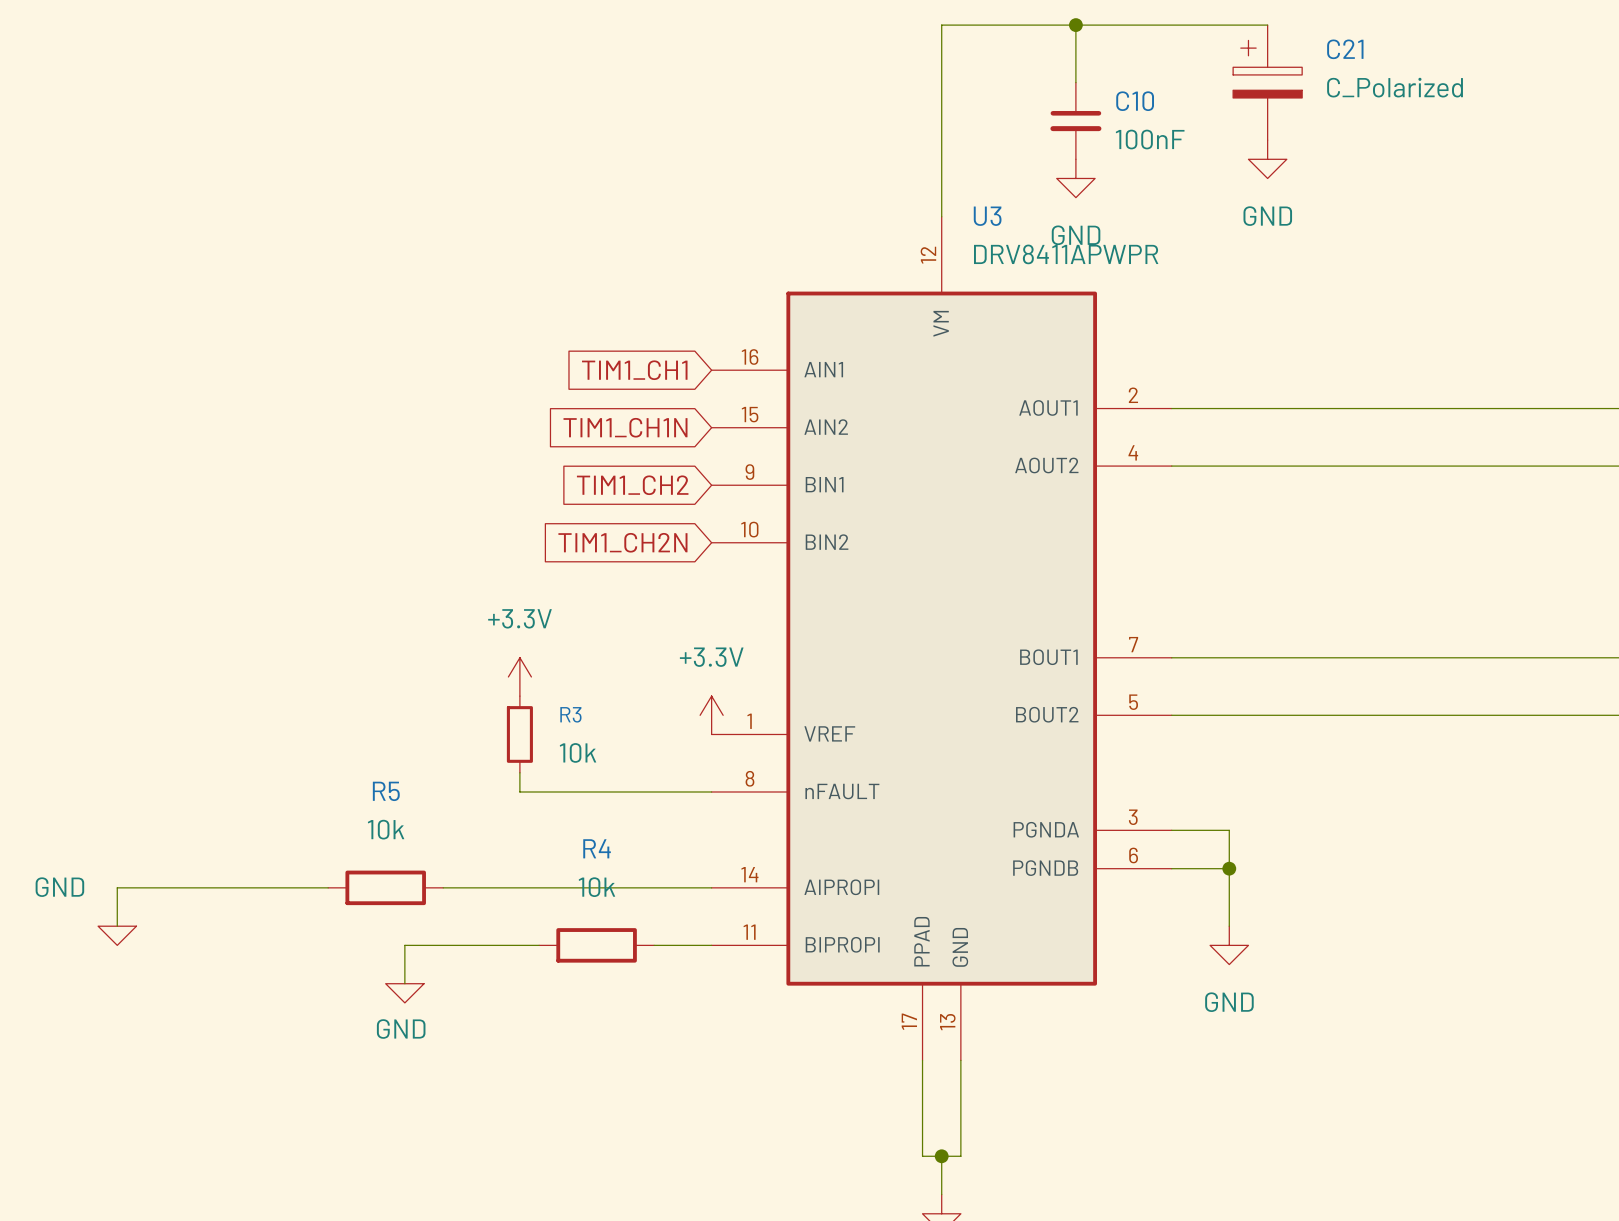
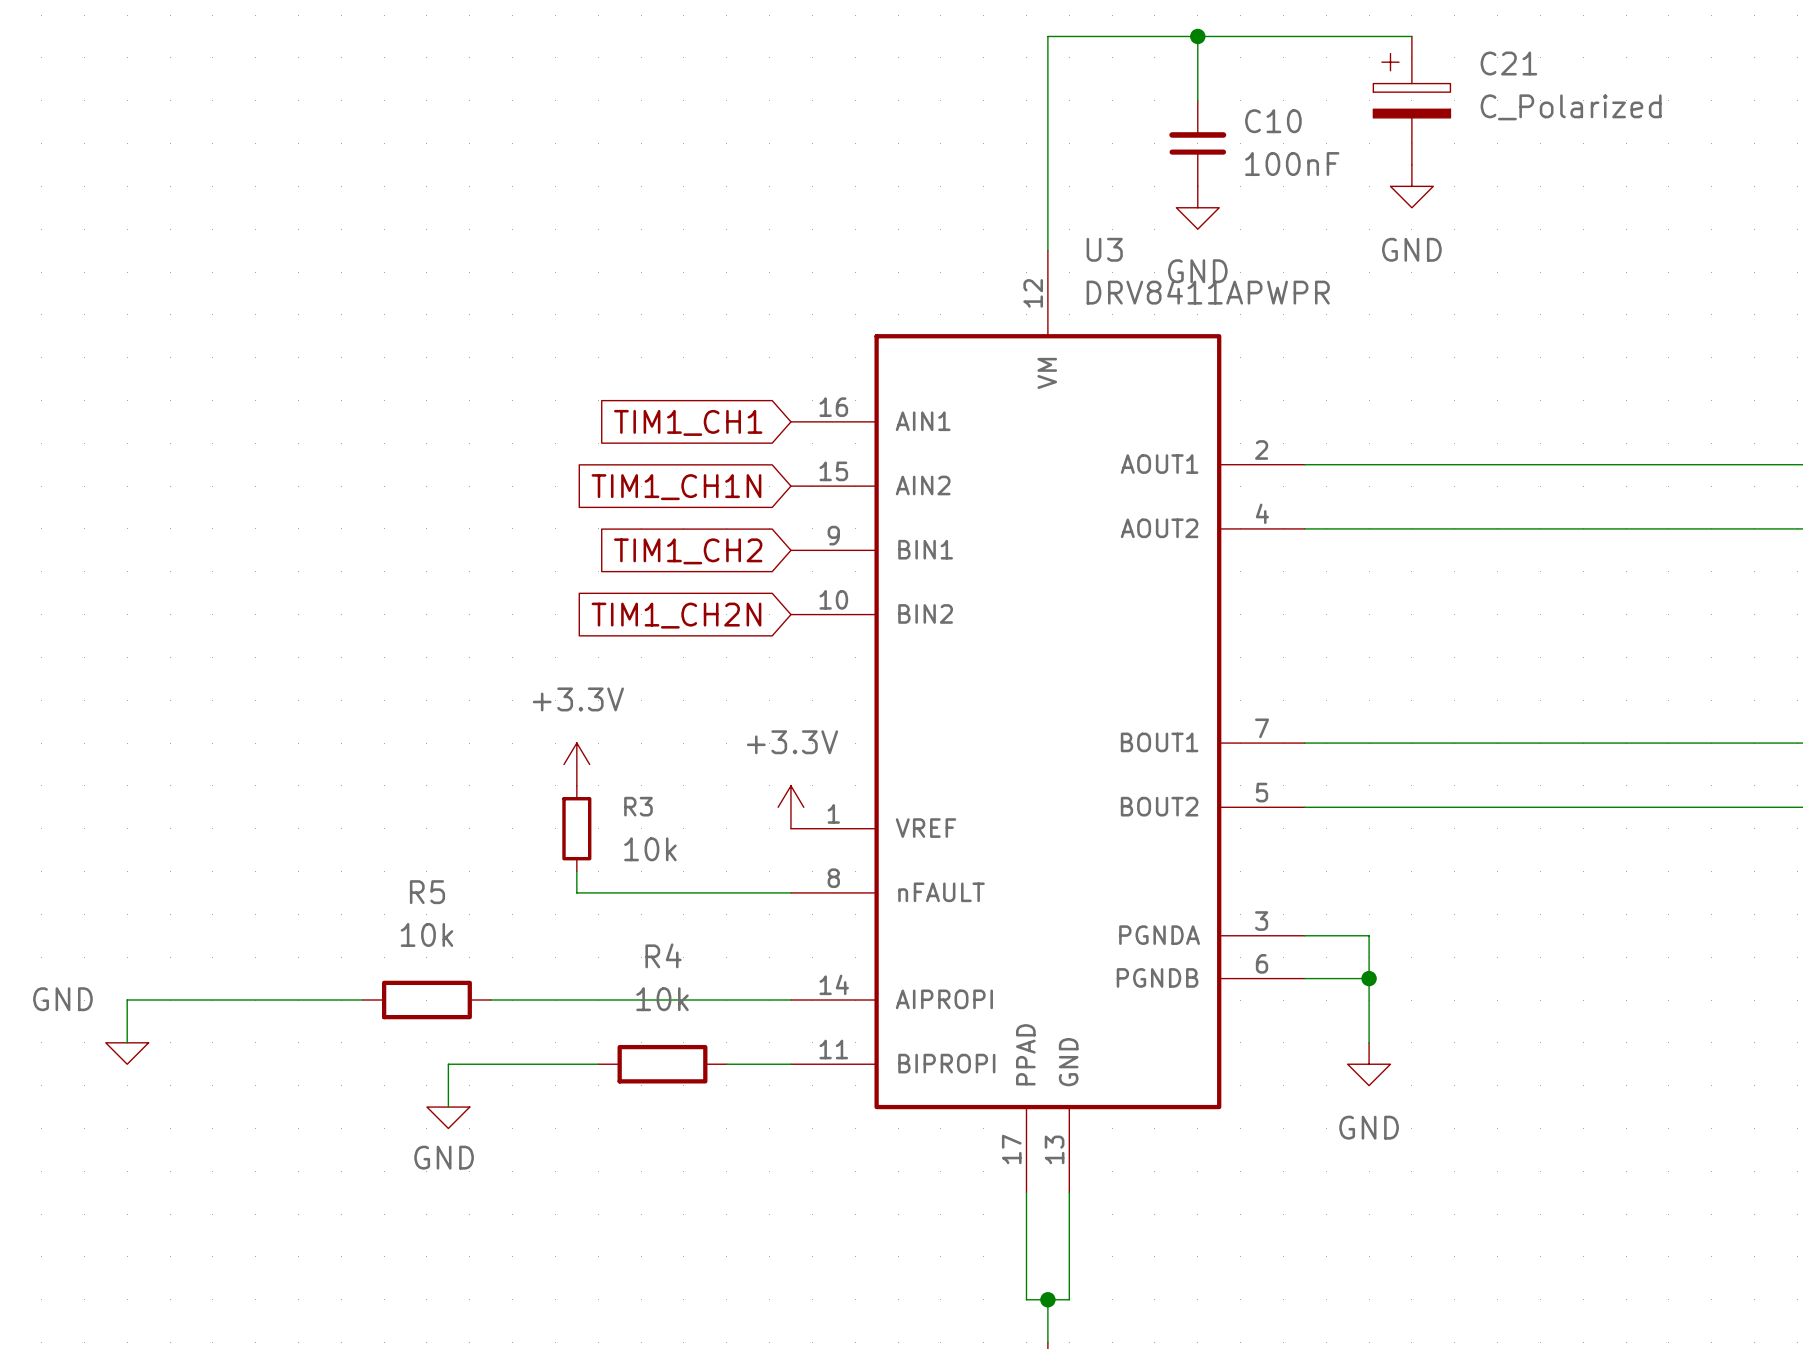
C10 rotation: 0° (1075, 121) -> 180° (1197, 143)

